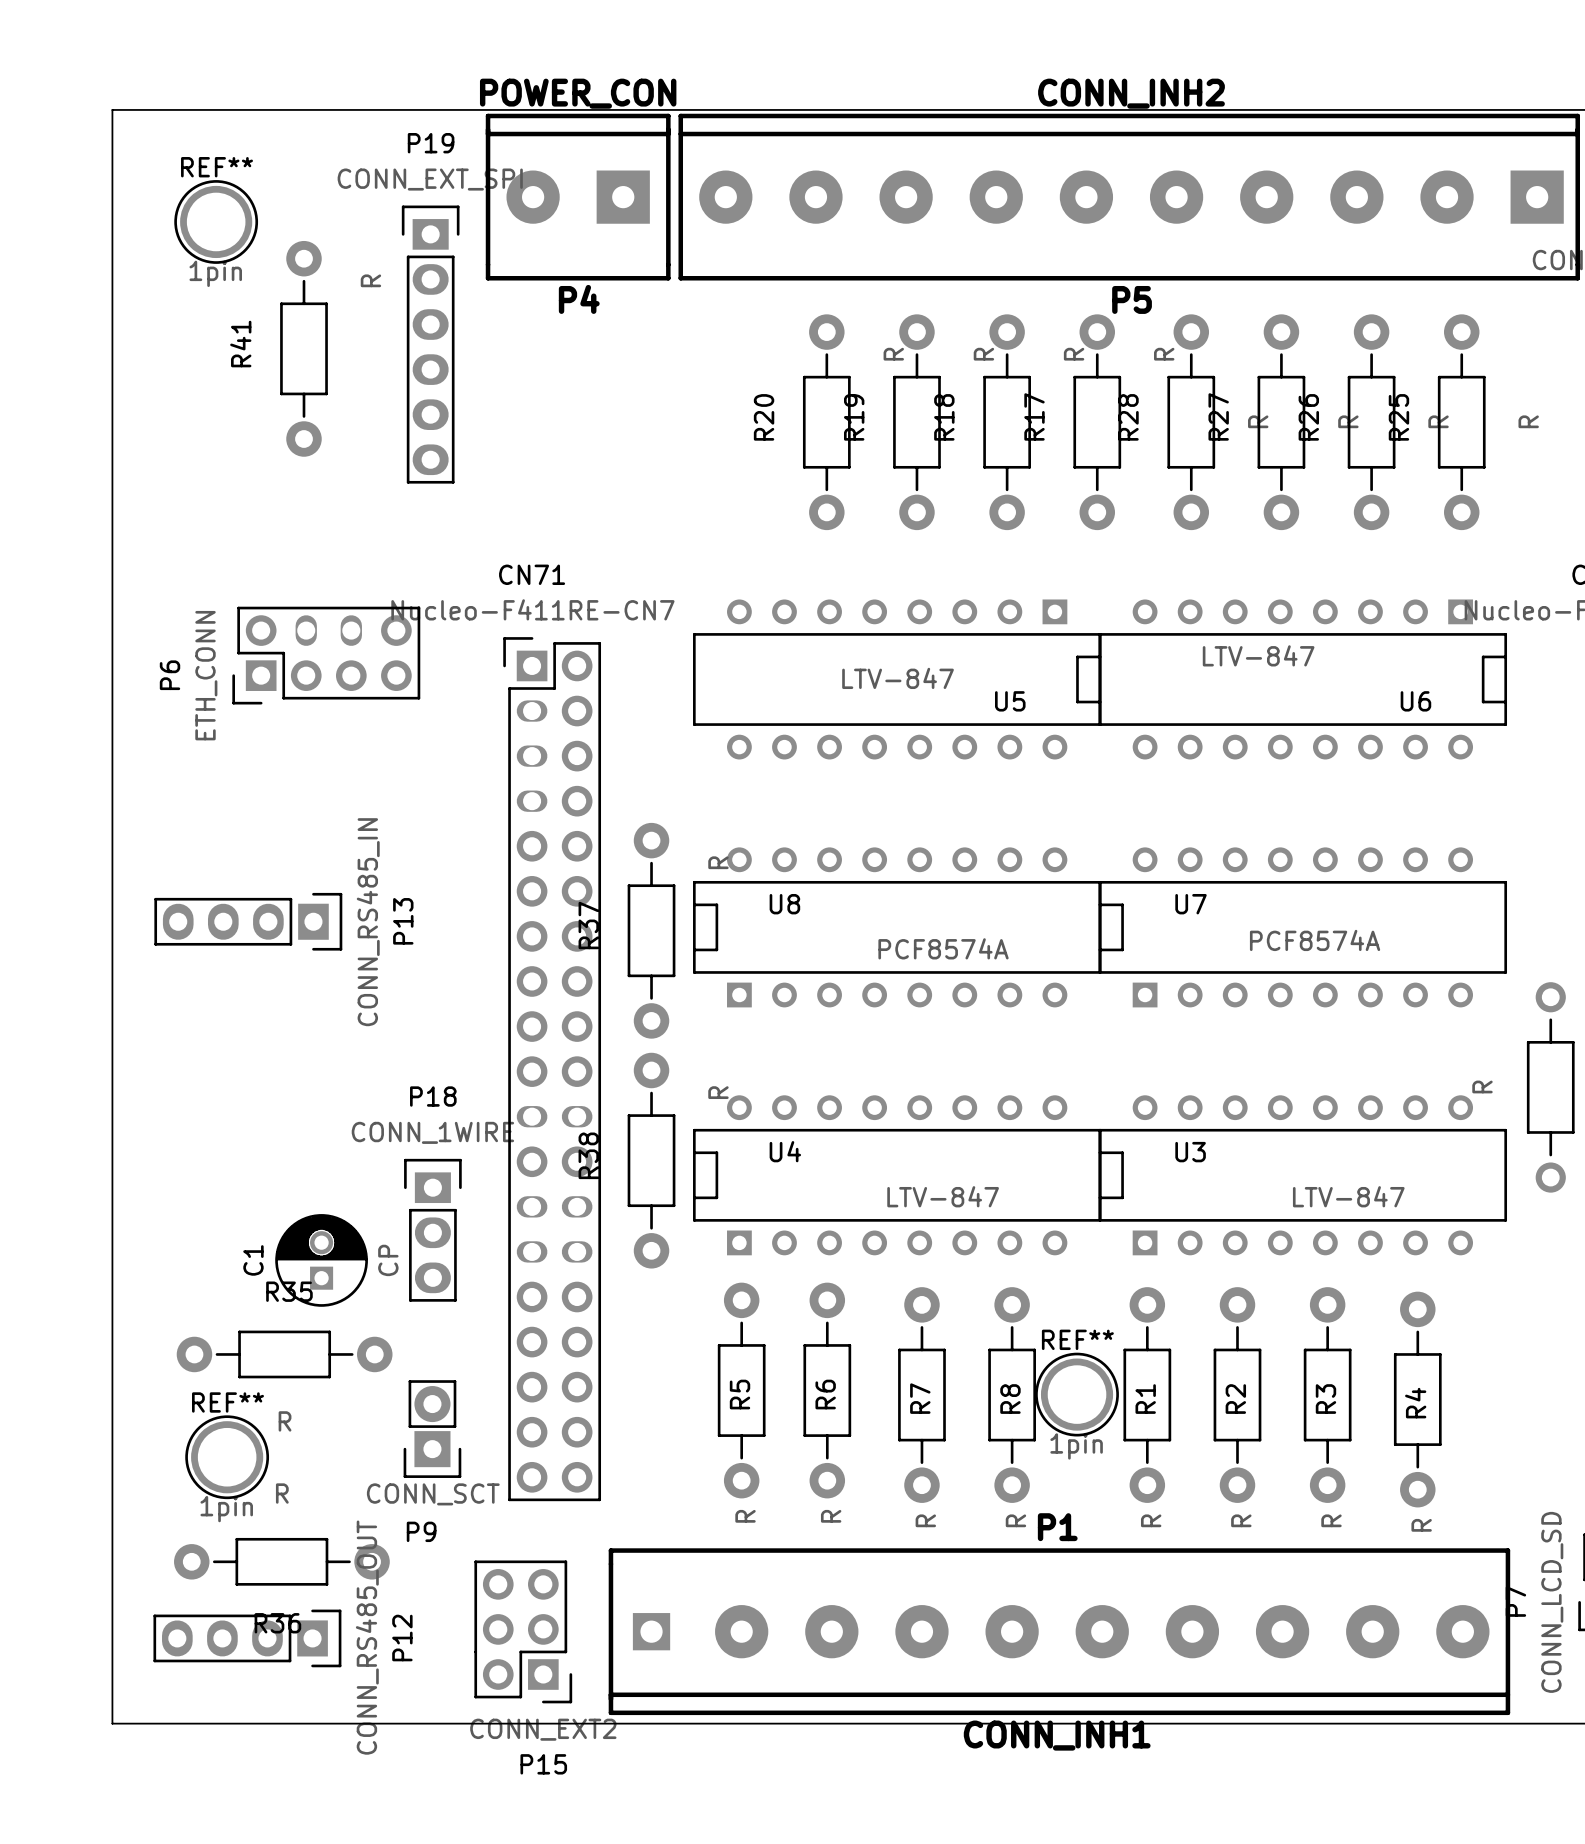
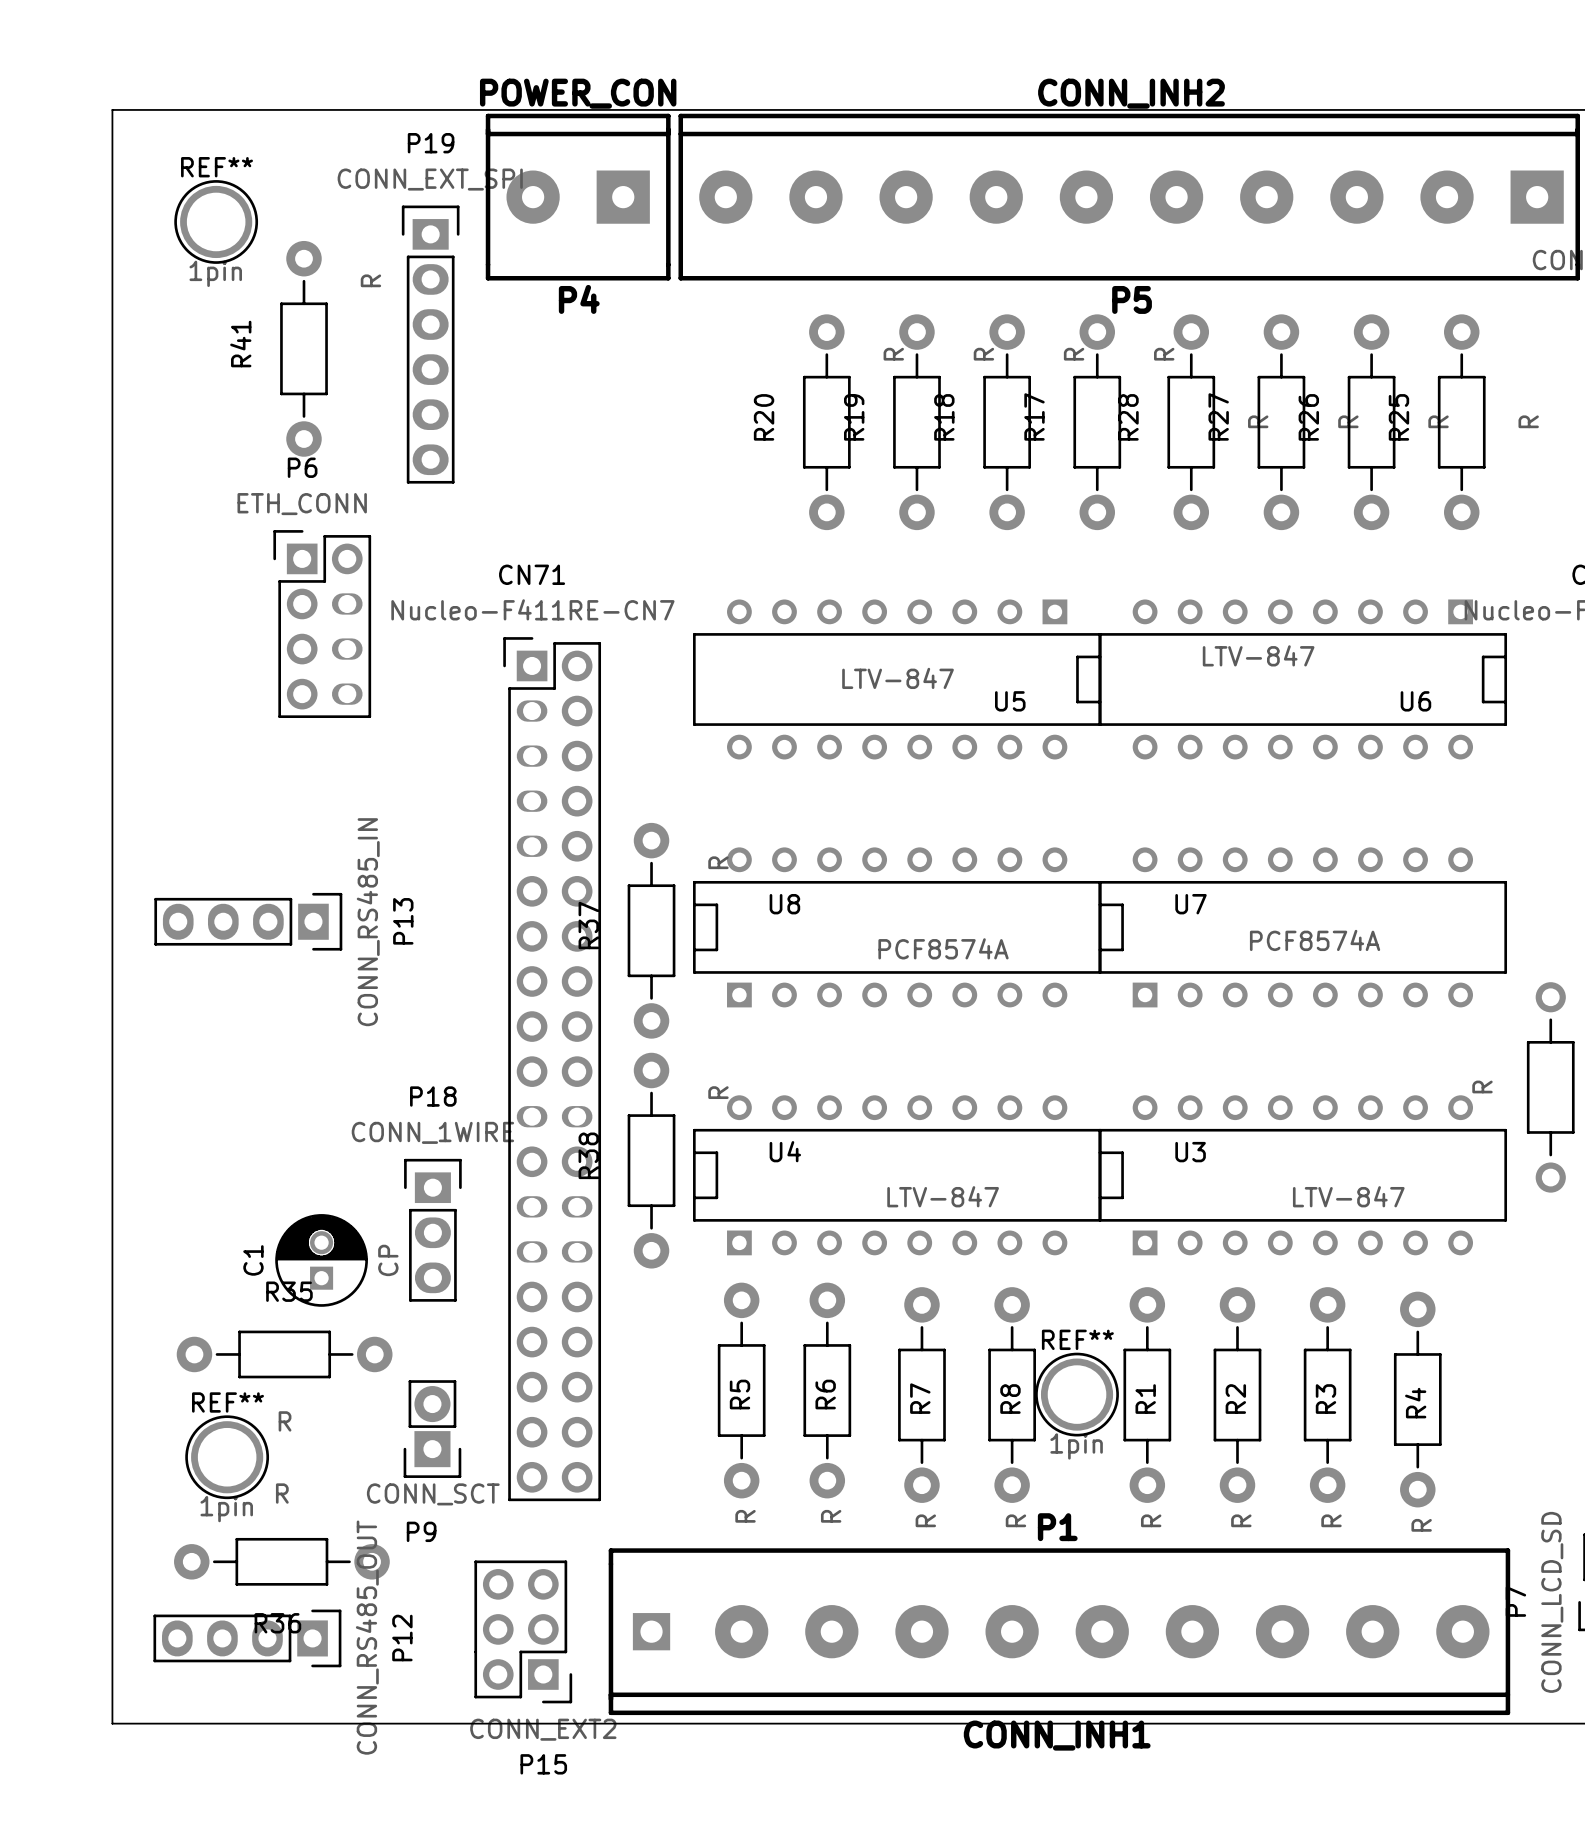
P6 footprint: [232, 606, 421, 705] -> [273, 530, 372, 719]
CN71 footprint: [503, 637, 602, 1502] -> [503, 637, 602, 1502]
P6 name position: P6 (170, 675) -> P6 (302, 467)
P6 value position: ETH_CONN (206, 675) -> ETH_CONN (302, 504)

